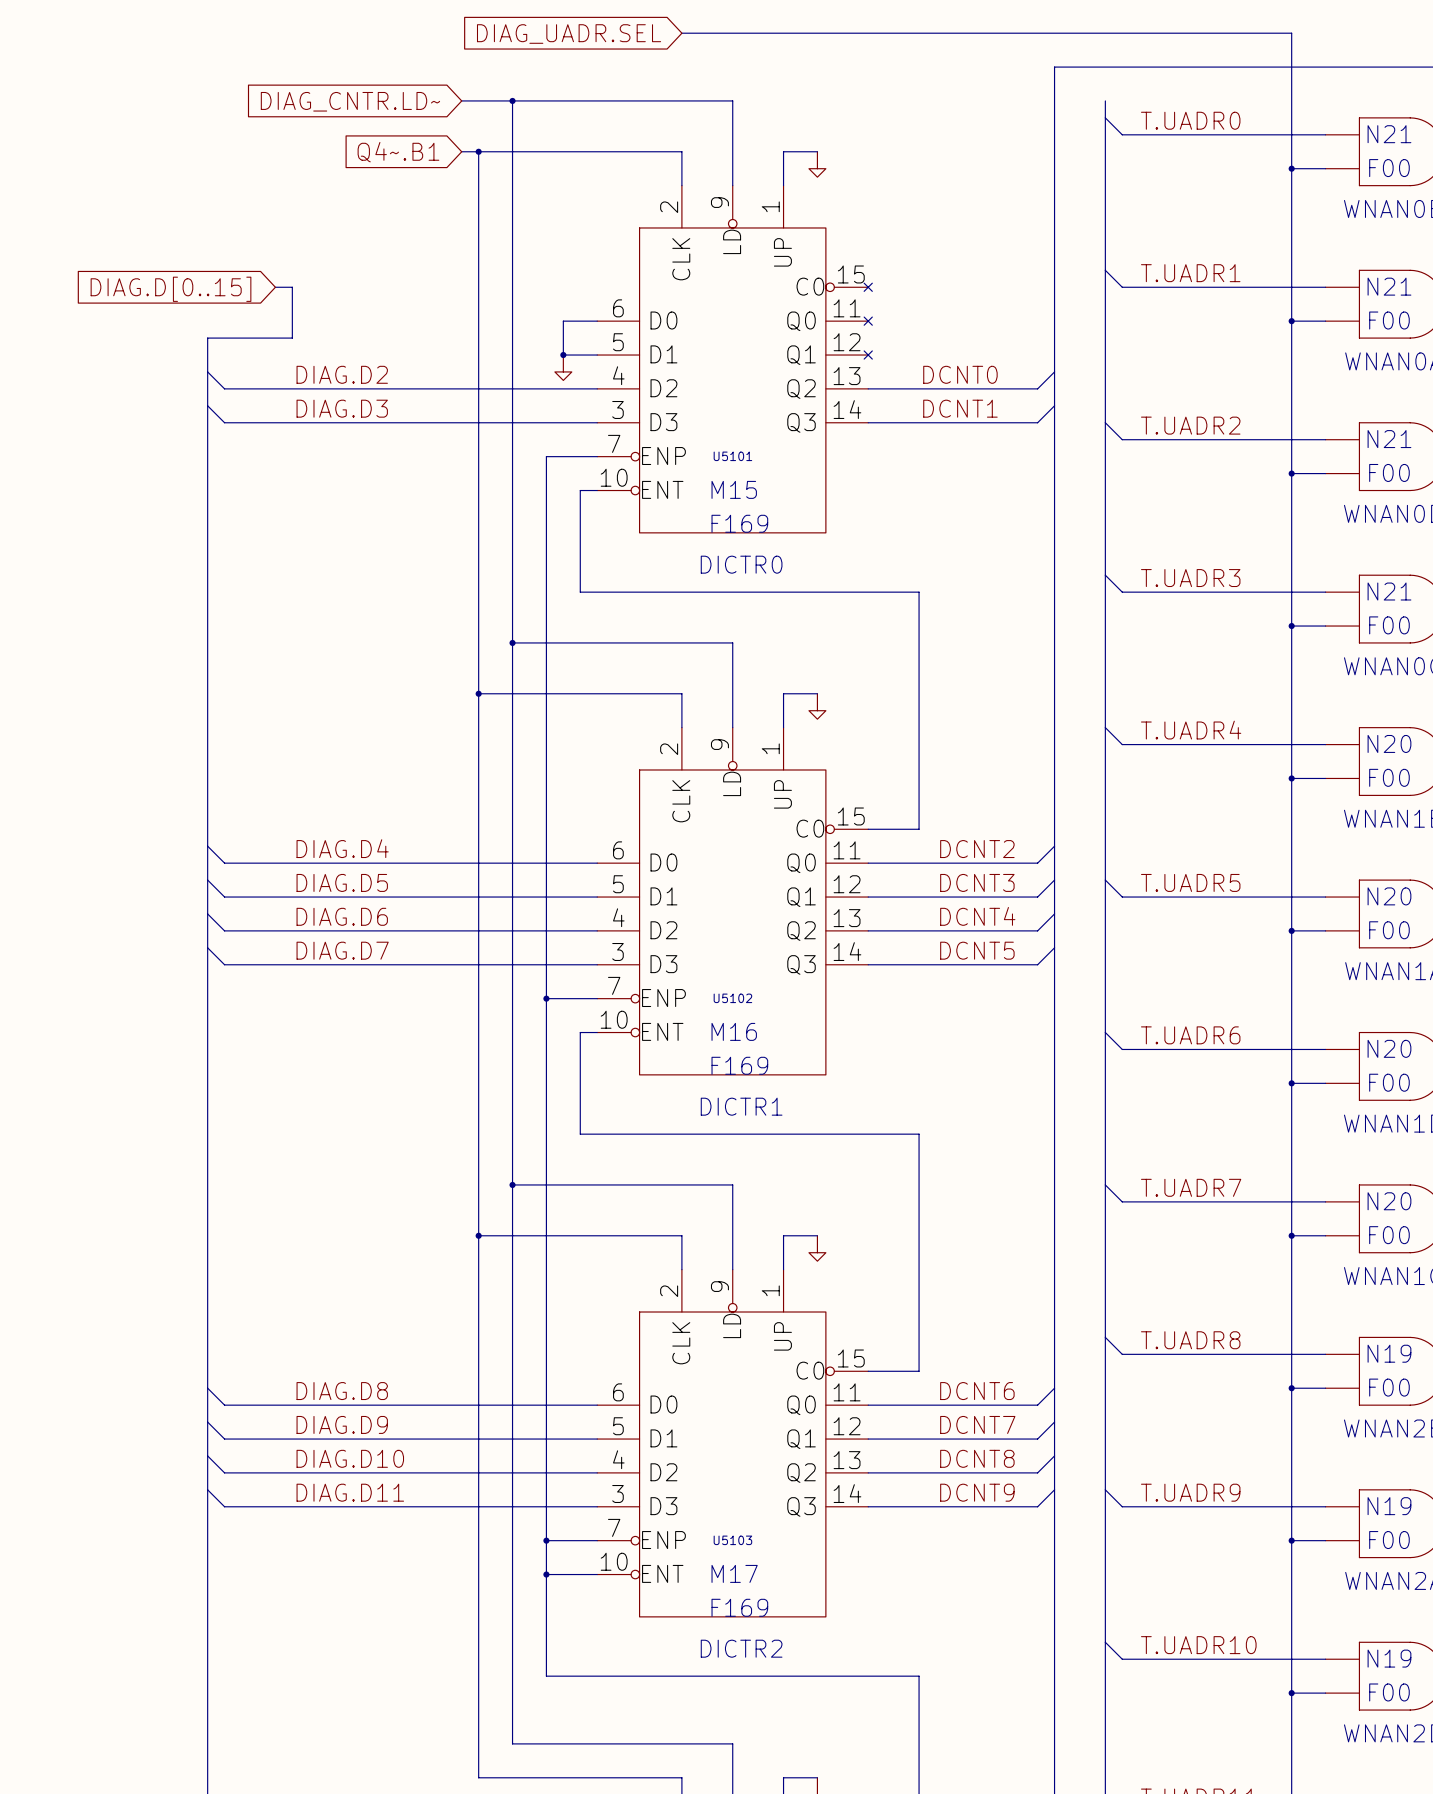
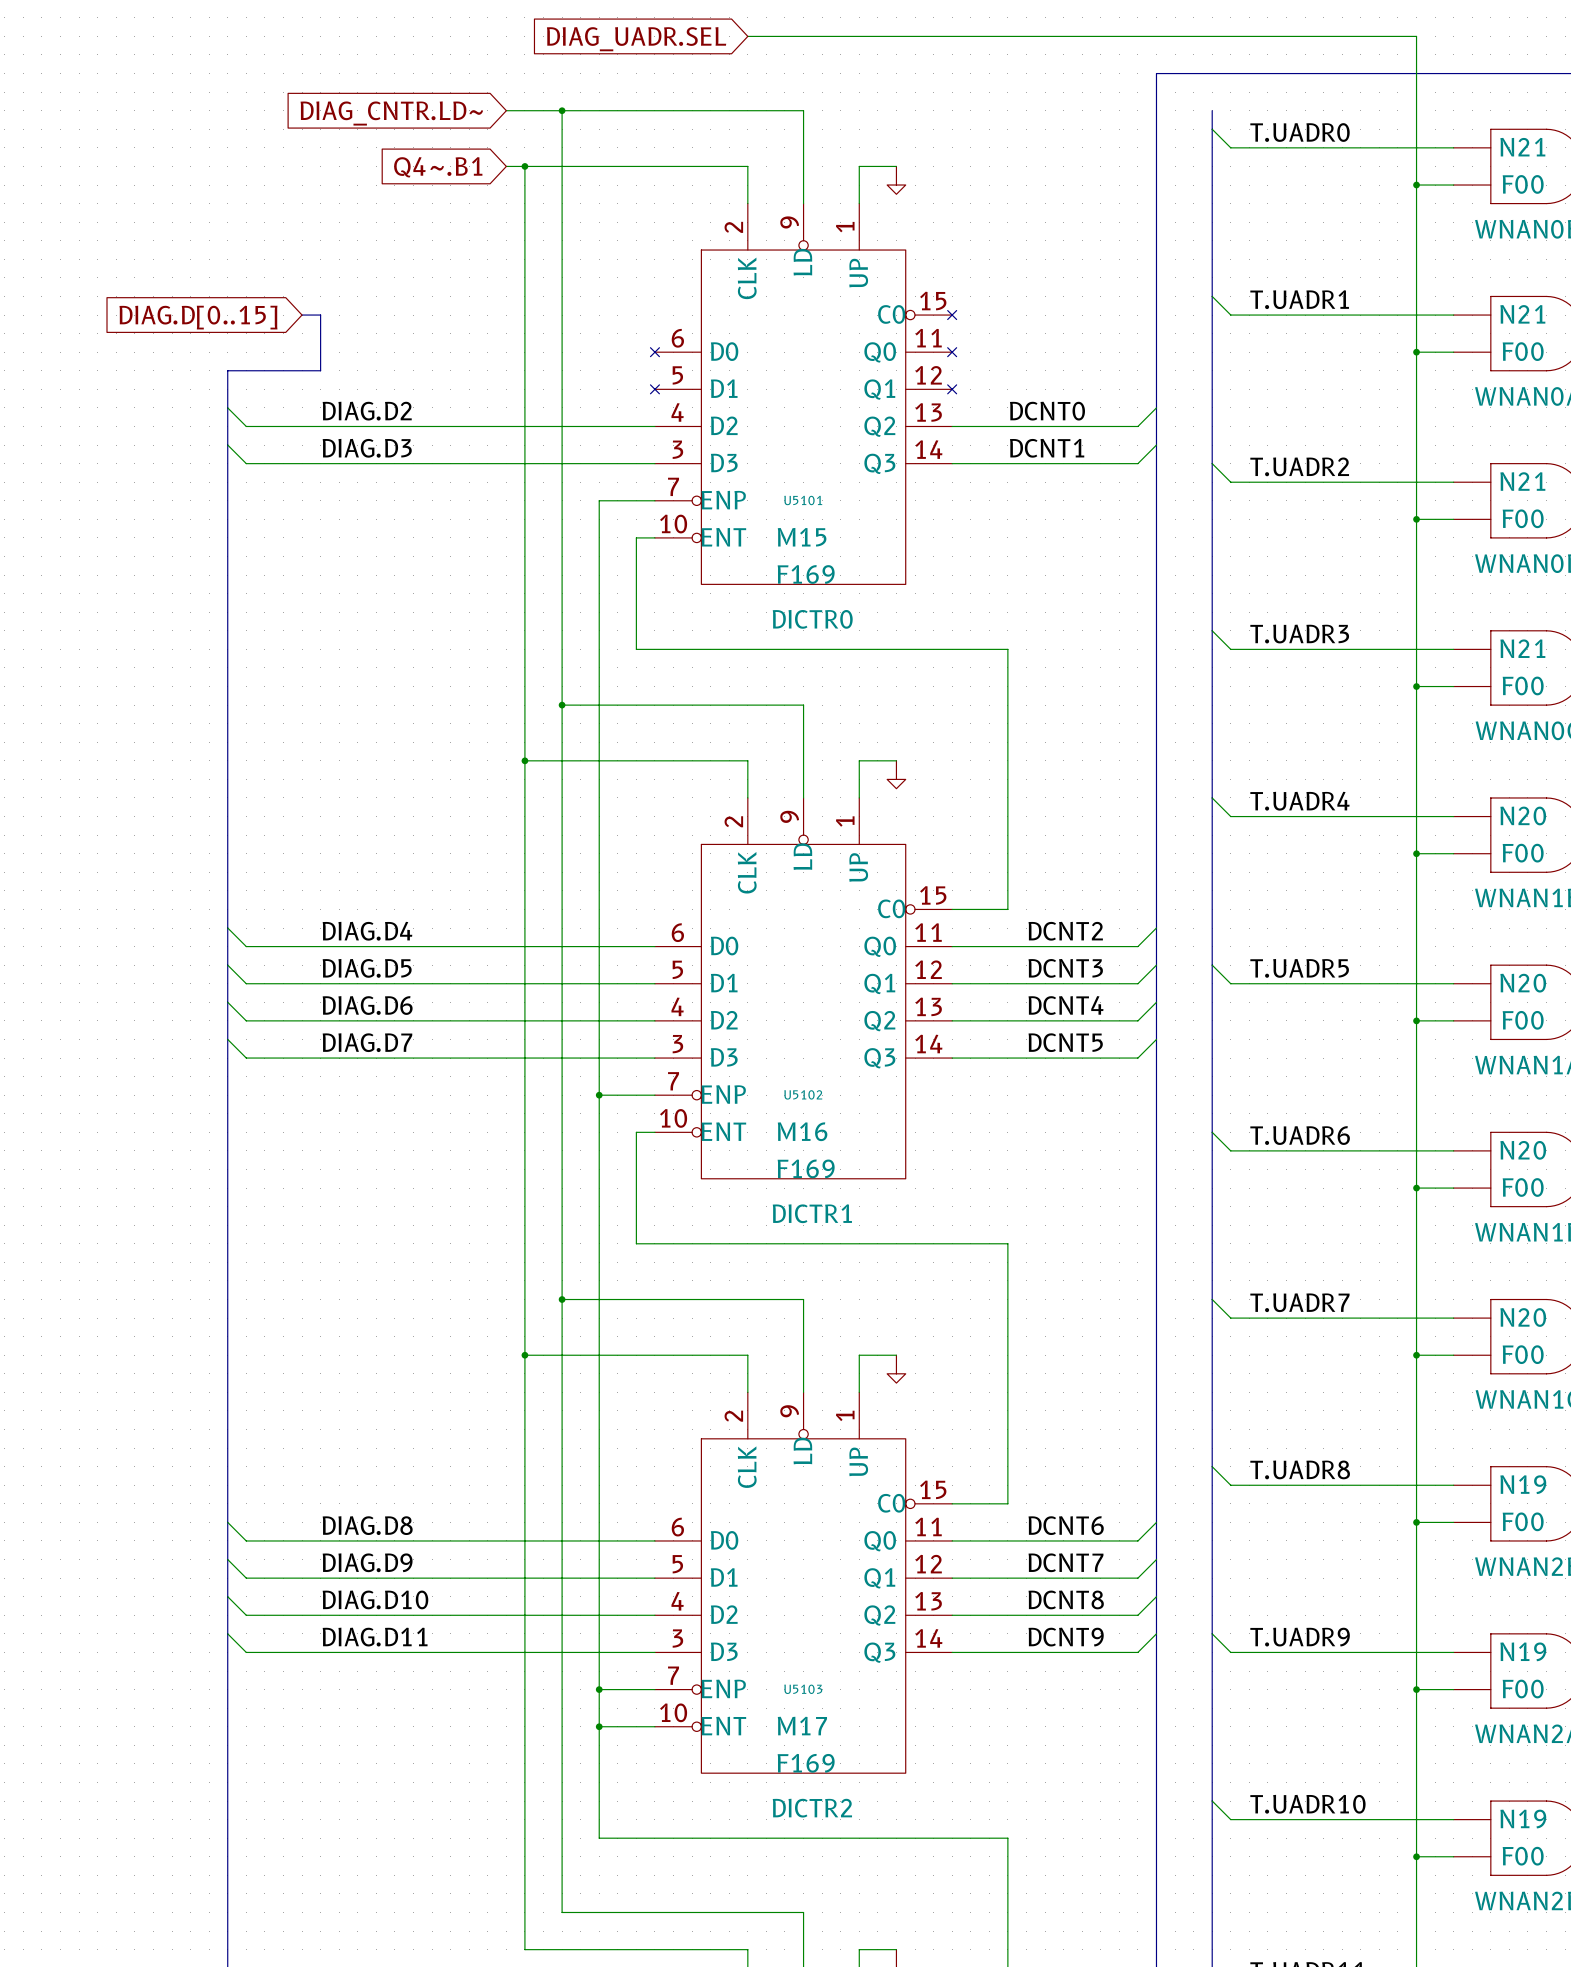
wire: (597, 321) (563, 321) (563, 355) (597, 355) -> none
no-connect mark: none -> (654, 352)
junction: (563, 355) -> none
no-connect mark: none -> (654, 389)
power symbol: (563, 367) -> none

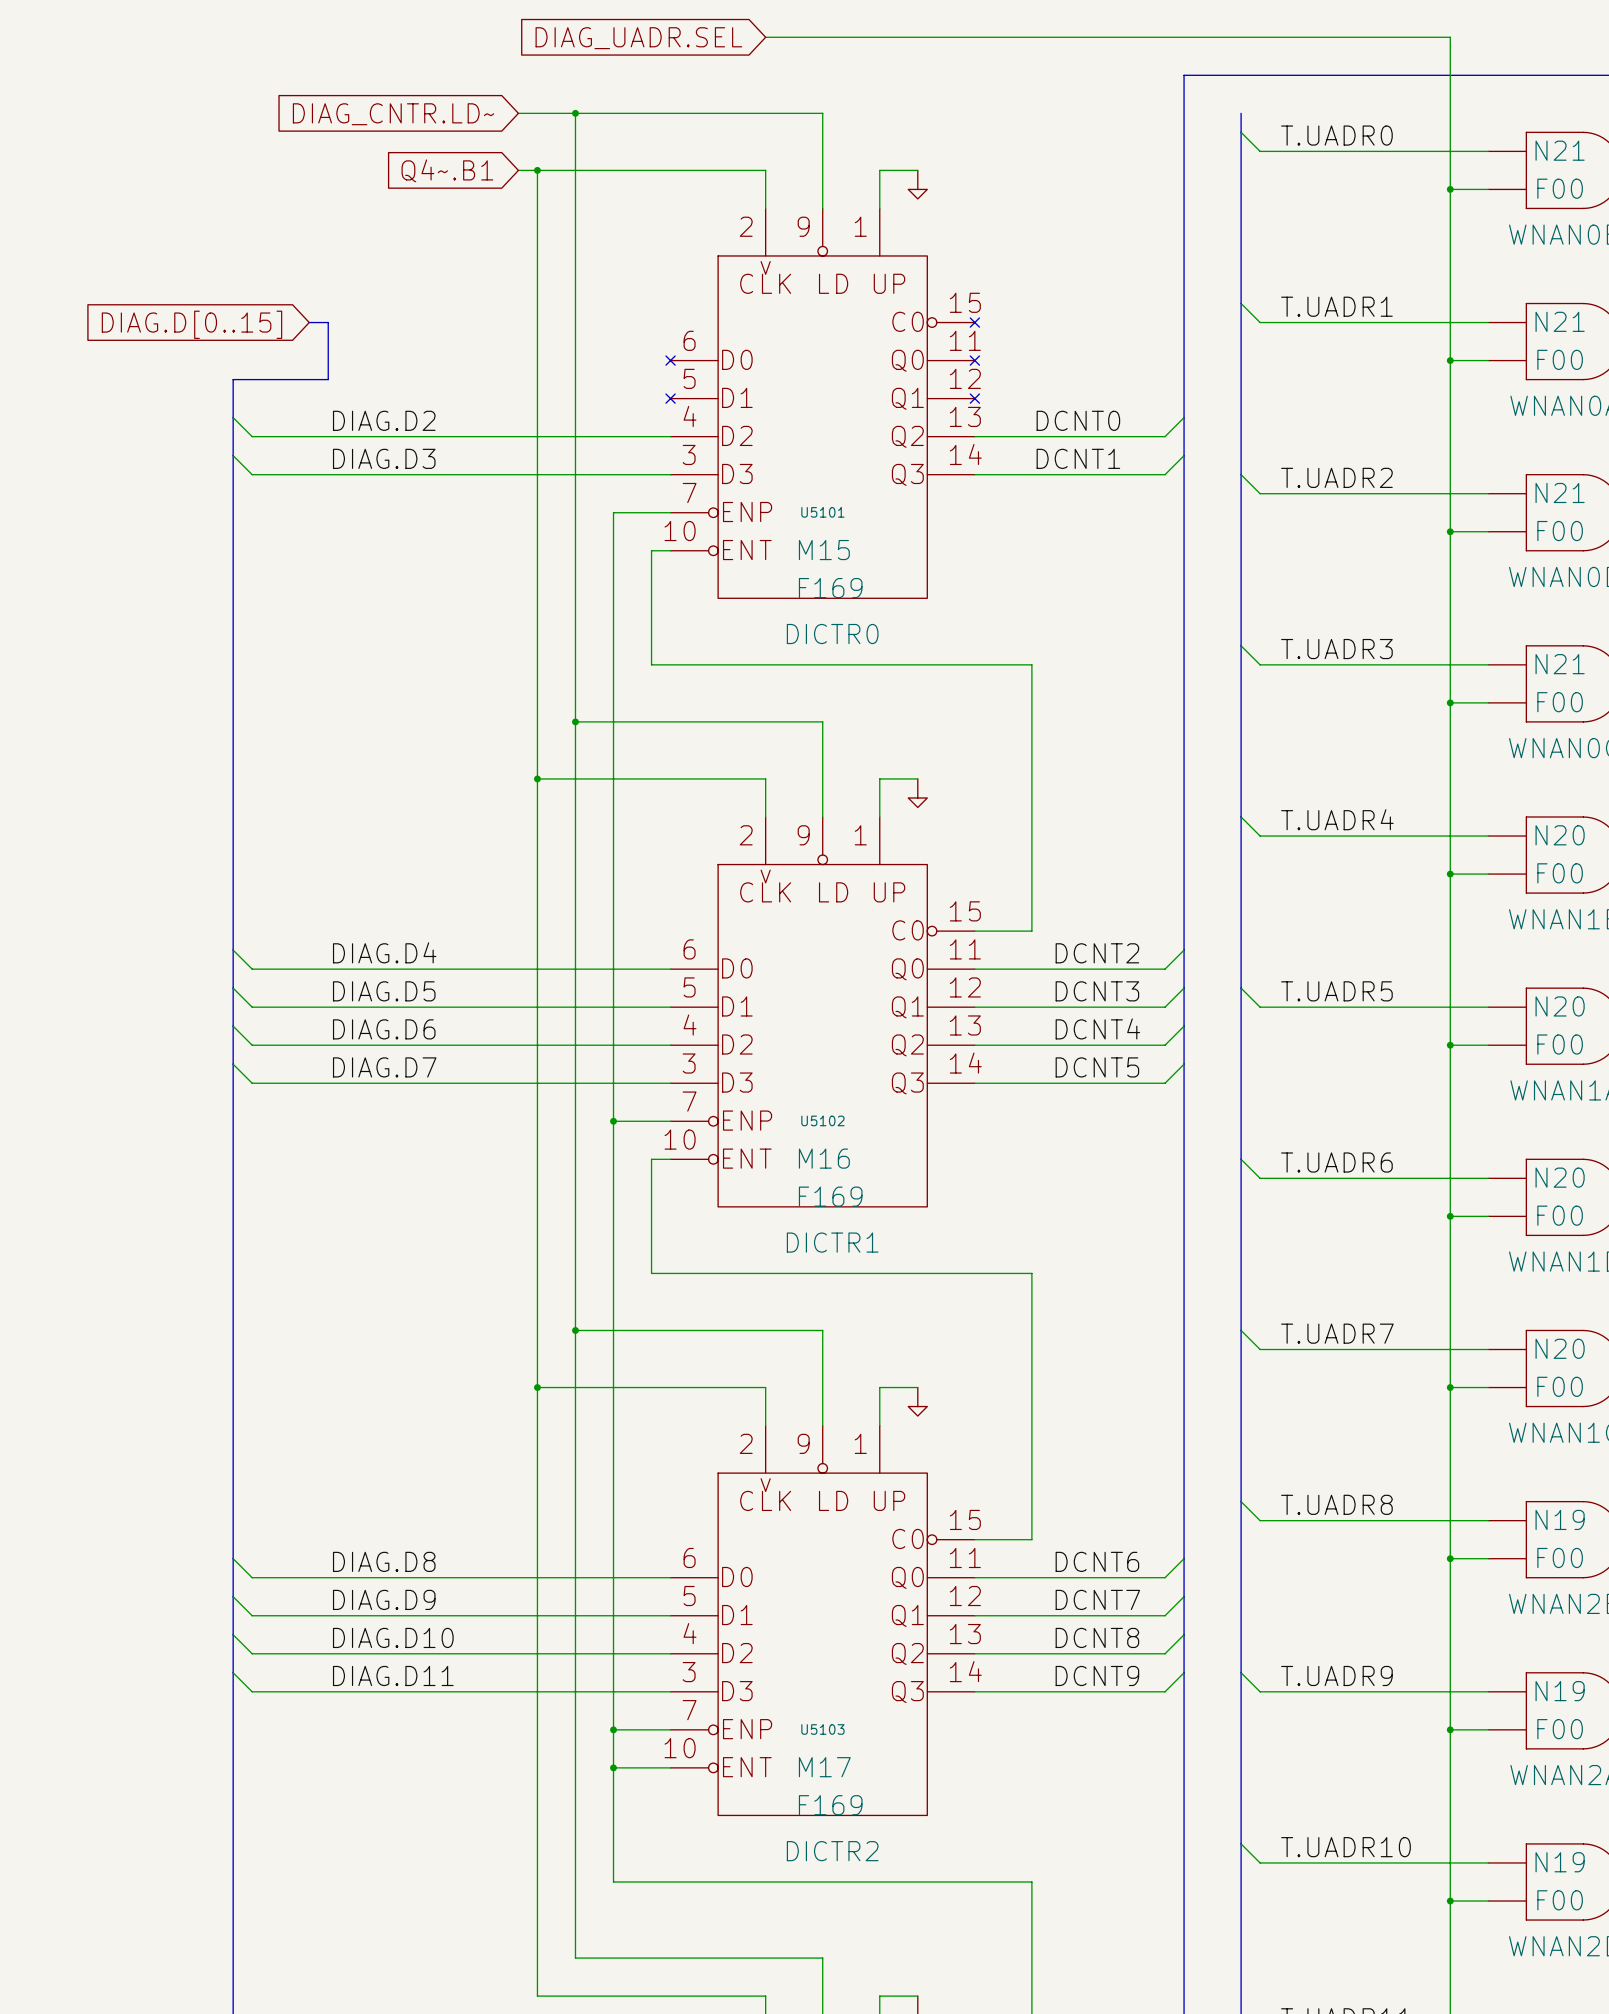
U5101 symbol: [654, 203, 953, 585] -> [670, 208, 975, 599]
U5102 symbol: [654, 797, 953, 1179] -> [670, 817, 975, 1207]
U5103 symbol: [654, 1392, 953, 1774] -> [670, 1425, 975, 1816]

